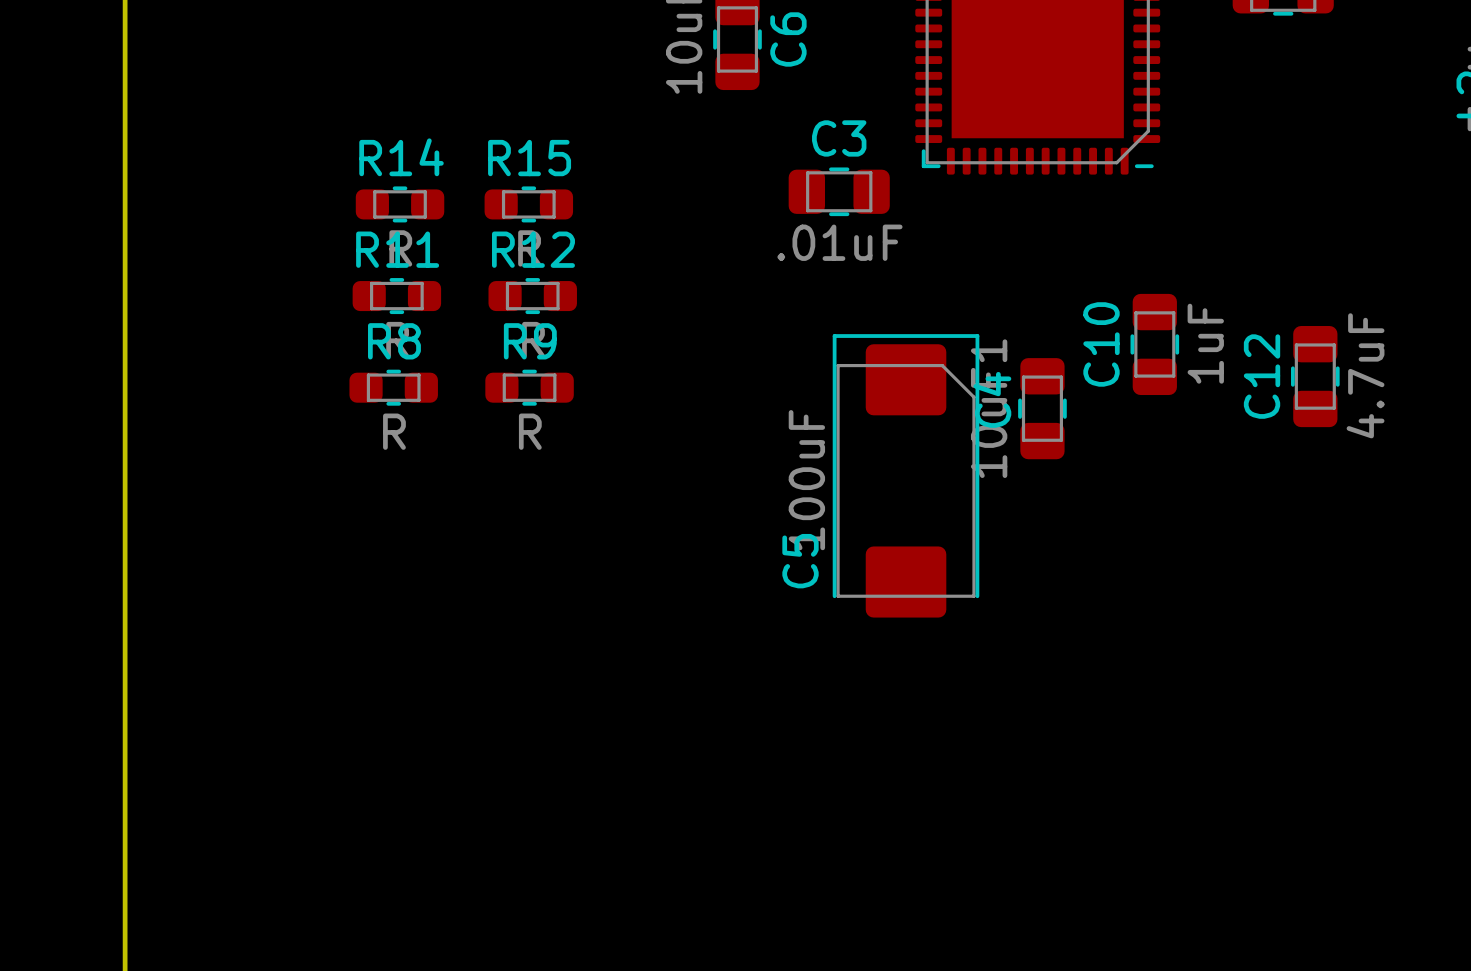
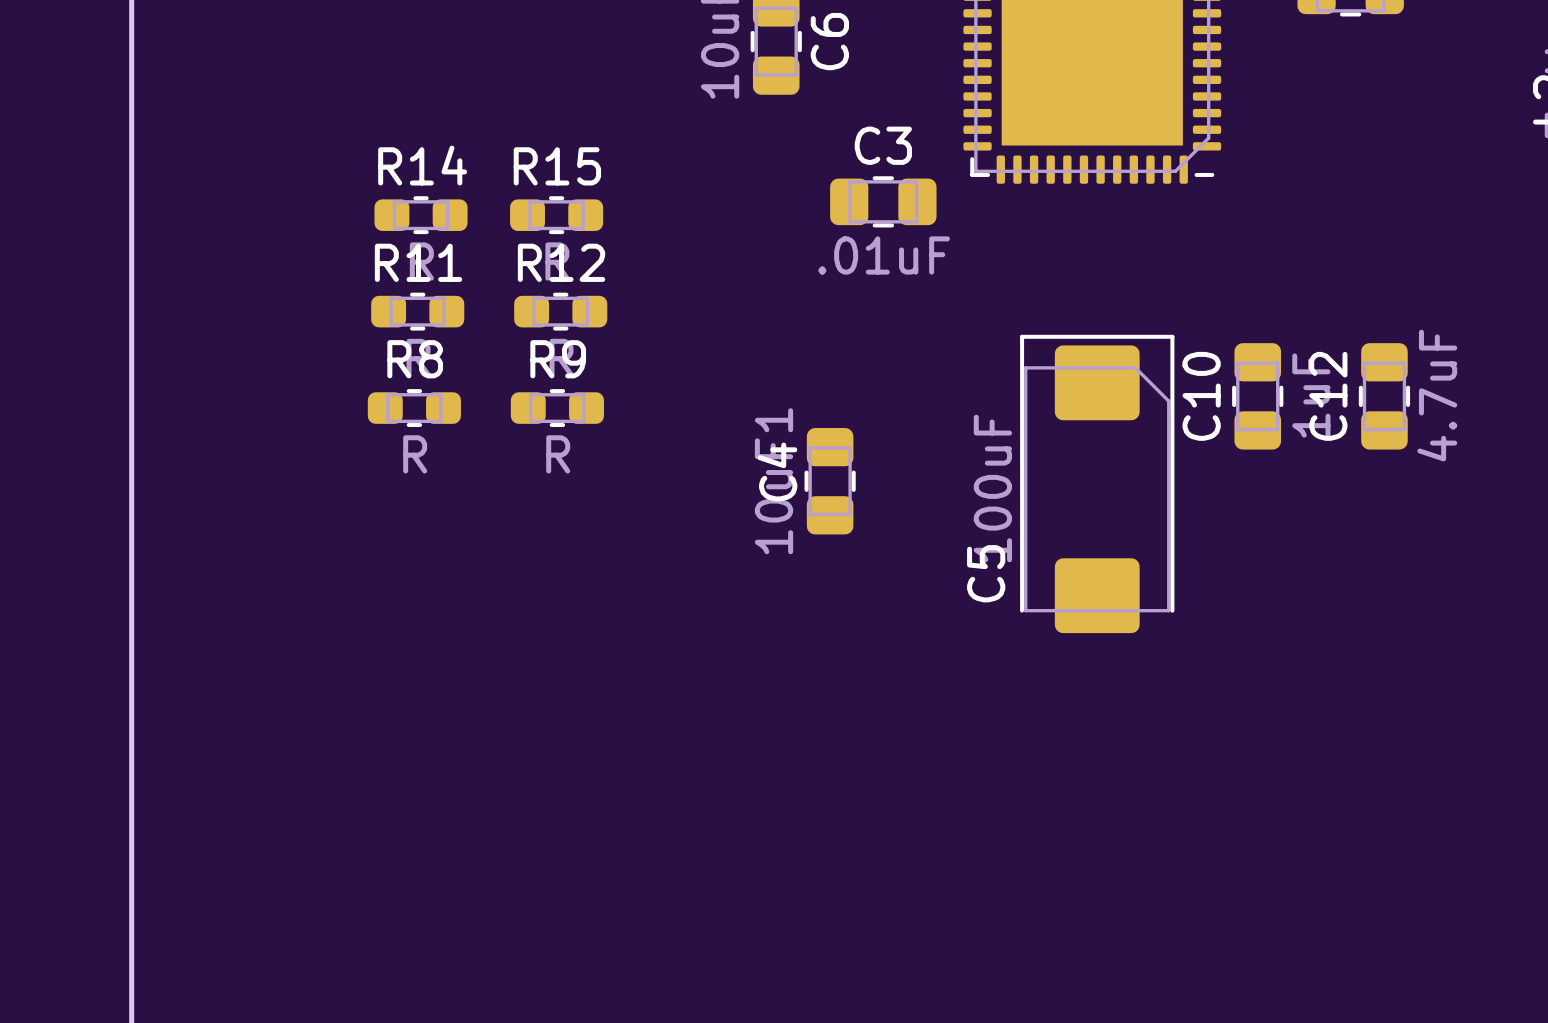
C10 position: (1154, 344) -> (1257, 396)
C4 position: (1042, 408) -> (830, 481)
C5 position: (906, 475) -> (1097, 483)

